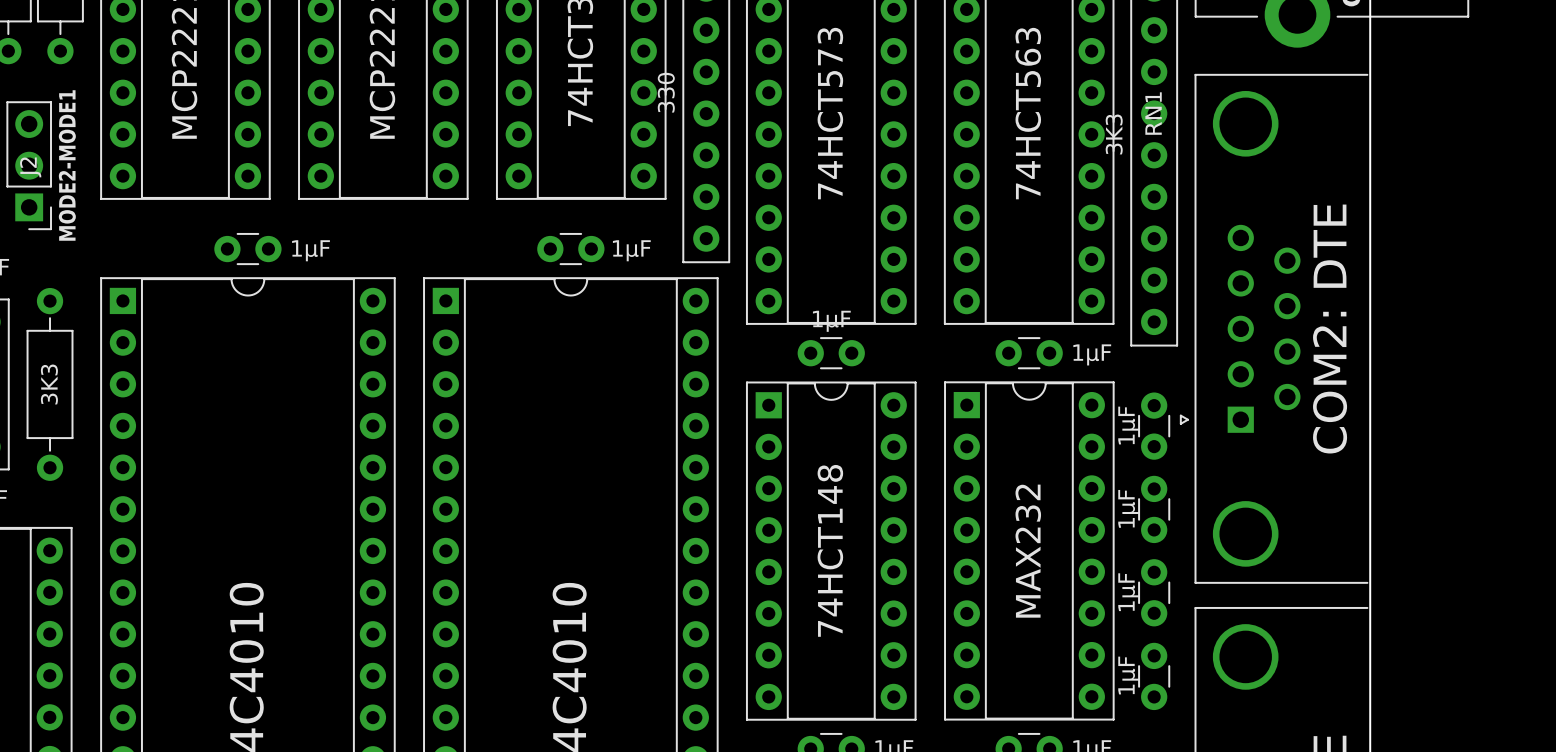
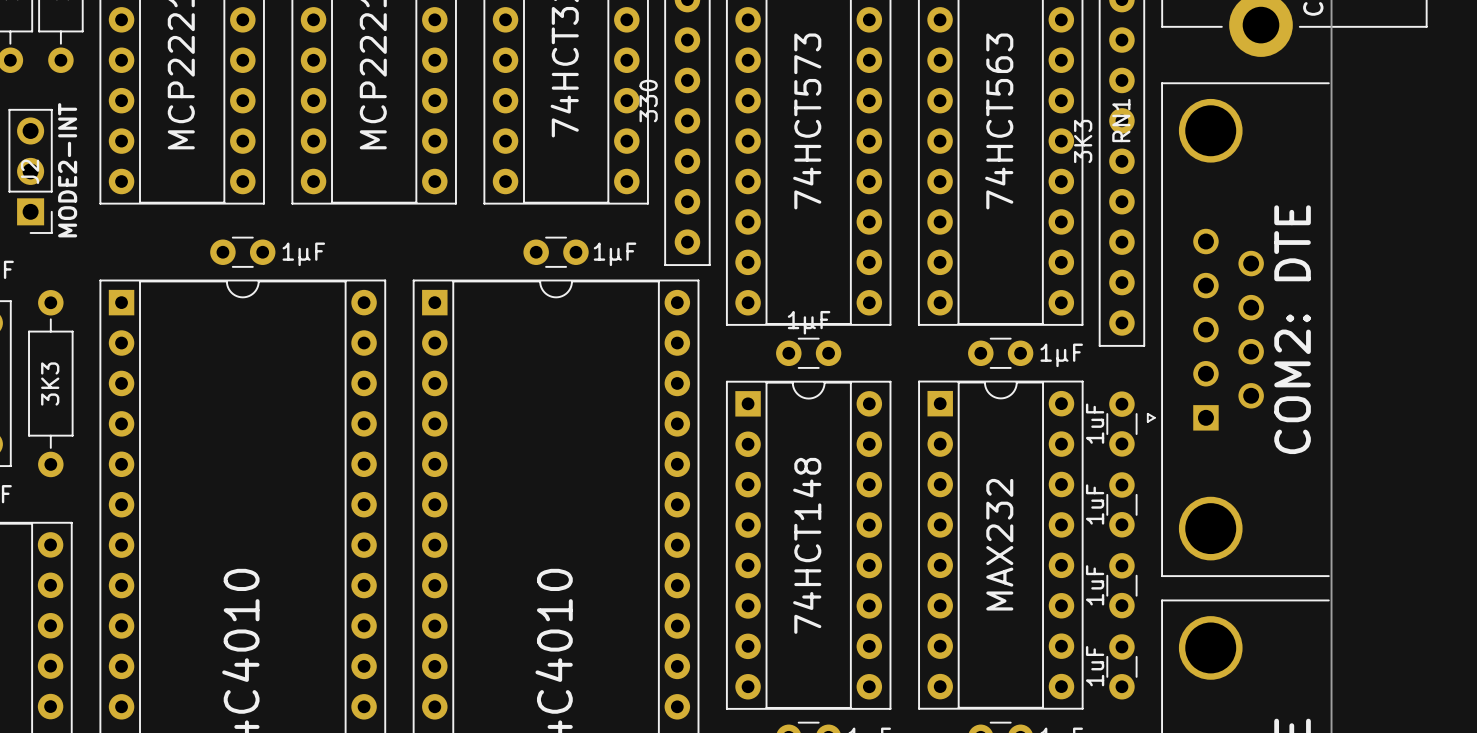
text: MODE2-MODE1 (67, 165) -> MODE2-INT (67, 170)
part value: 1µF (1128, 425) -> 1uF (1095, 423)
part value: 1µF (1128, 508) -> 1uF (1095, 504)
part value: 1µF (1128, 592) -> 1uF (1095, 585)
part value: 1µF (1128, 675) -> 1uF (1095, 666)

